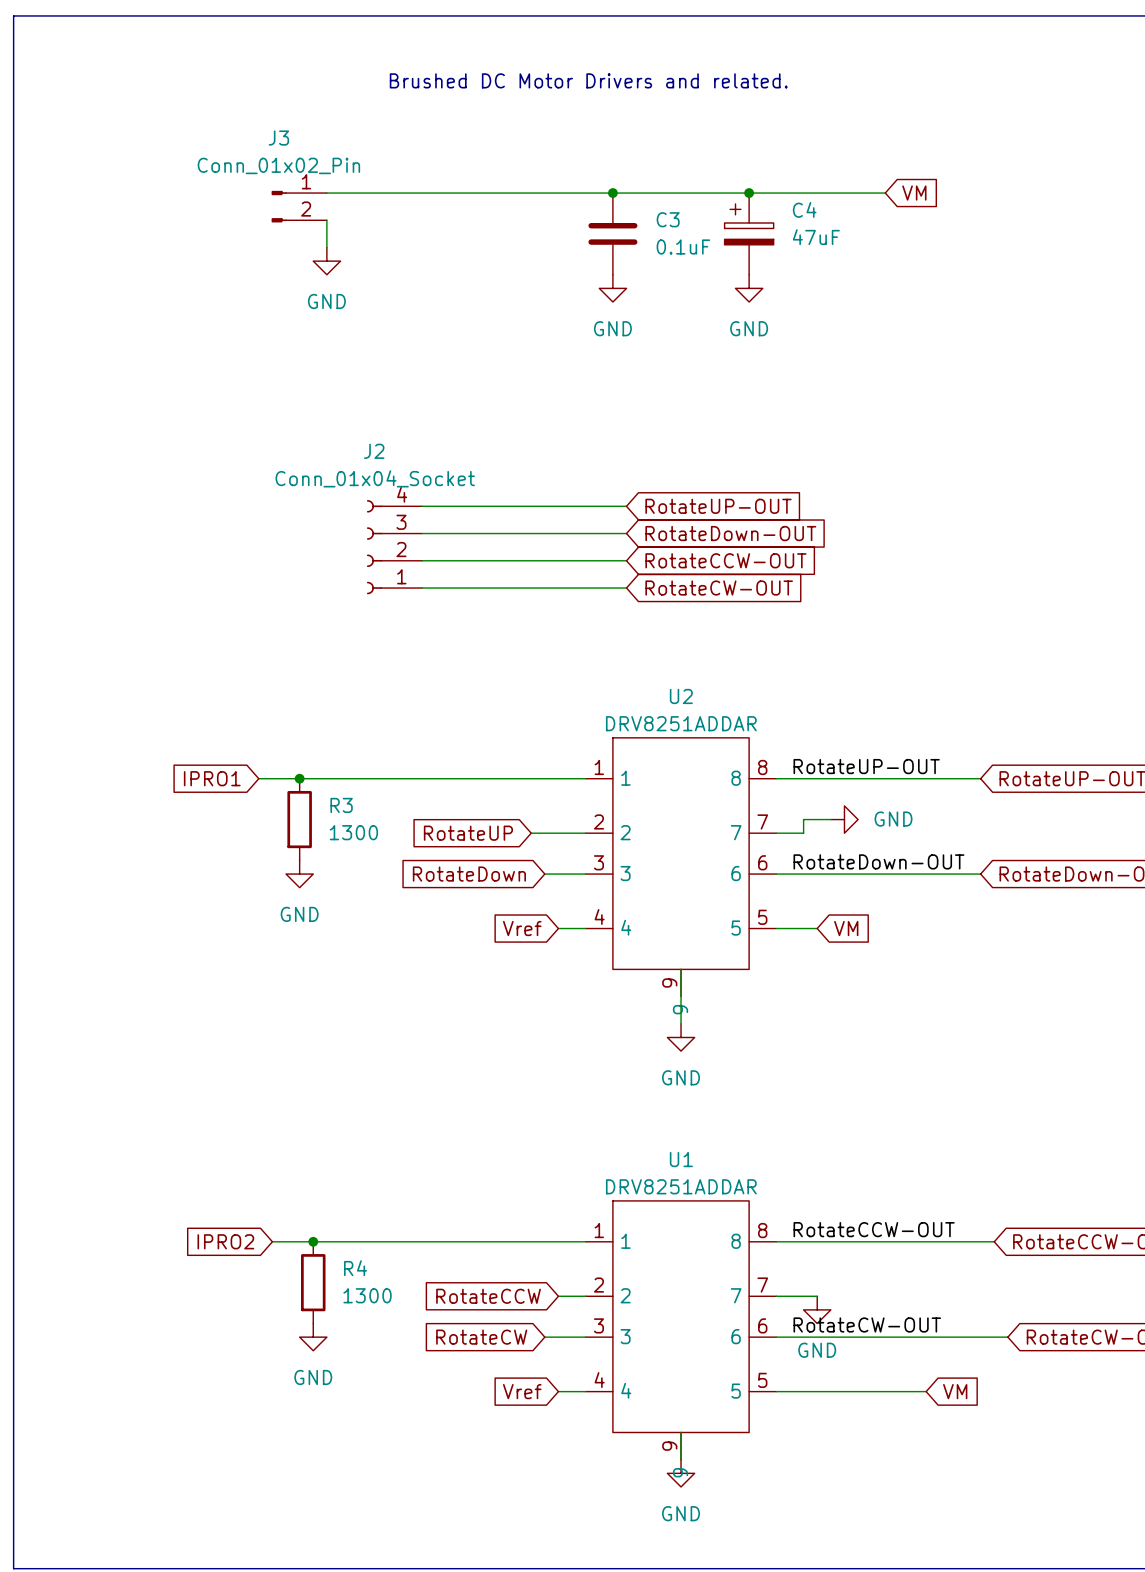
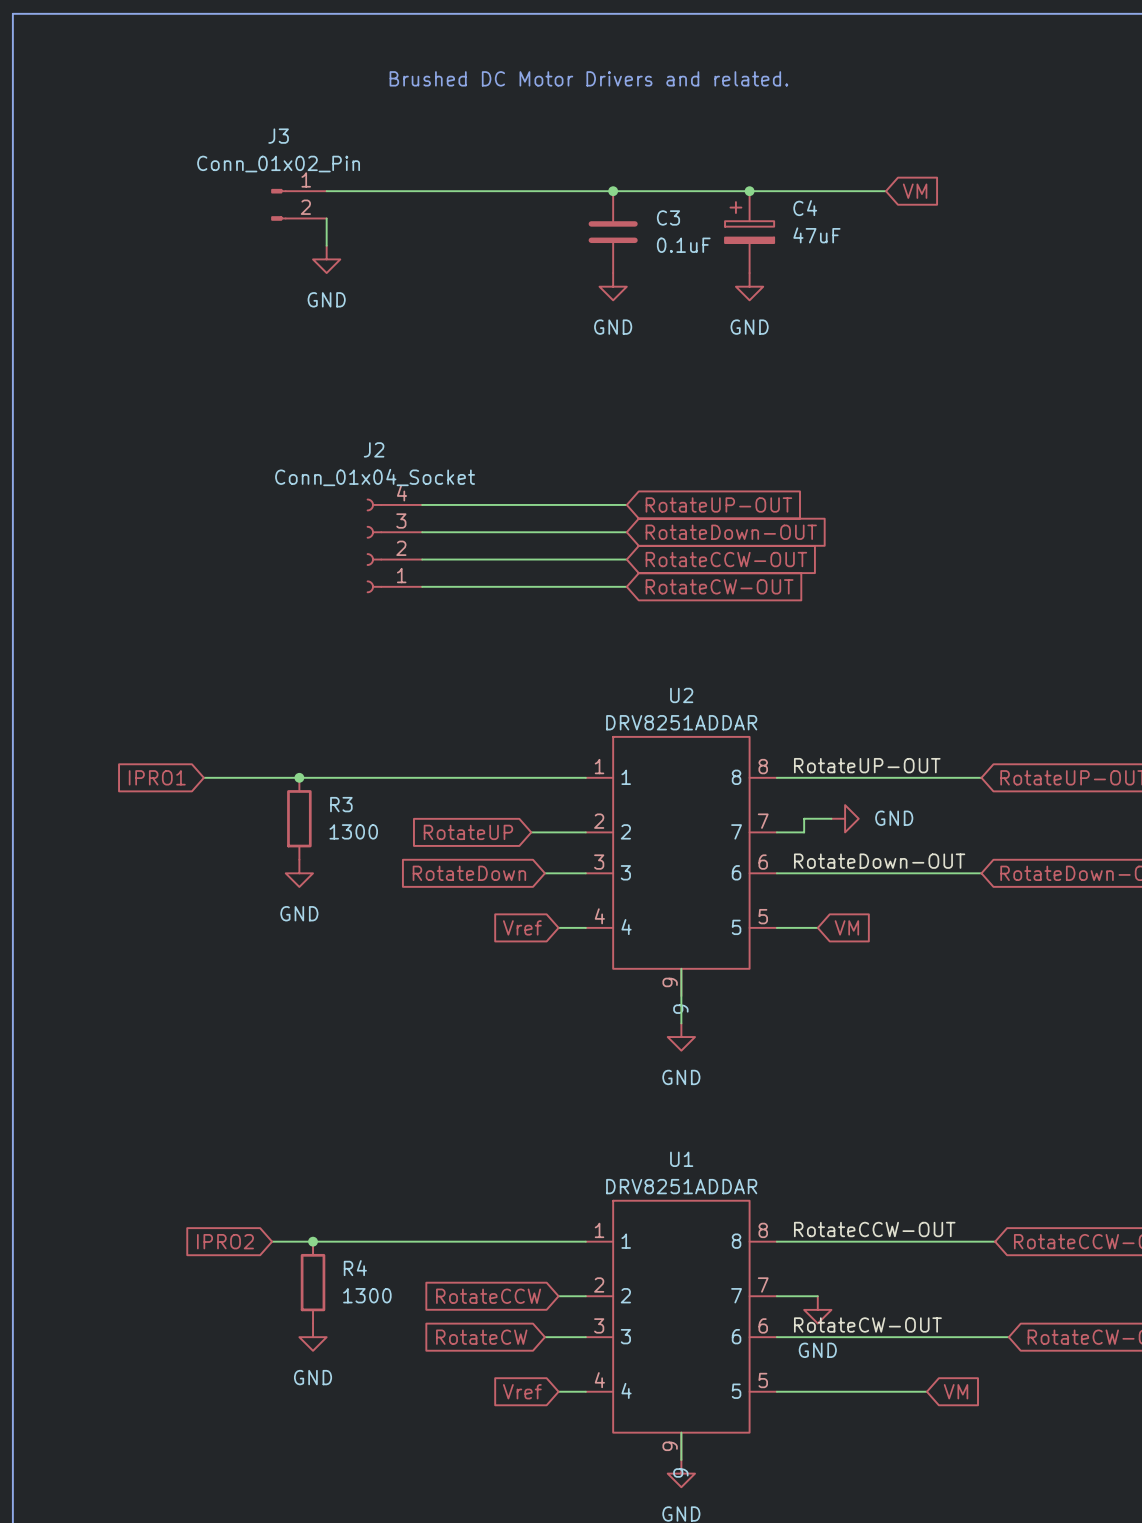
wire: none -> (203, 777) (258, 777)
global label position: IPRO1 (212, 778) -> IPRO1 (157, 777)

